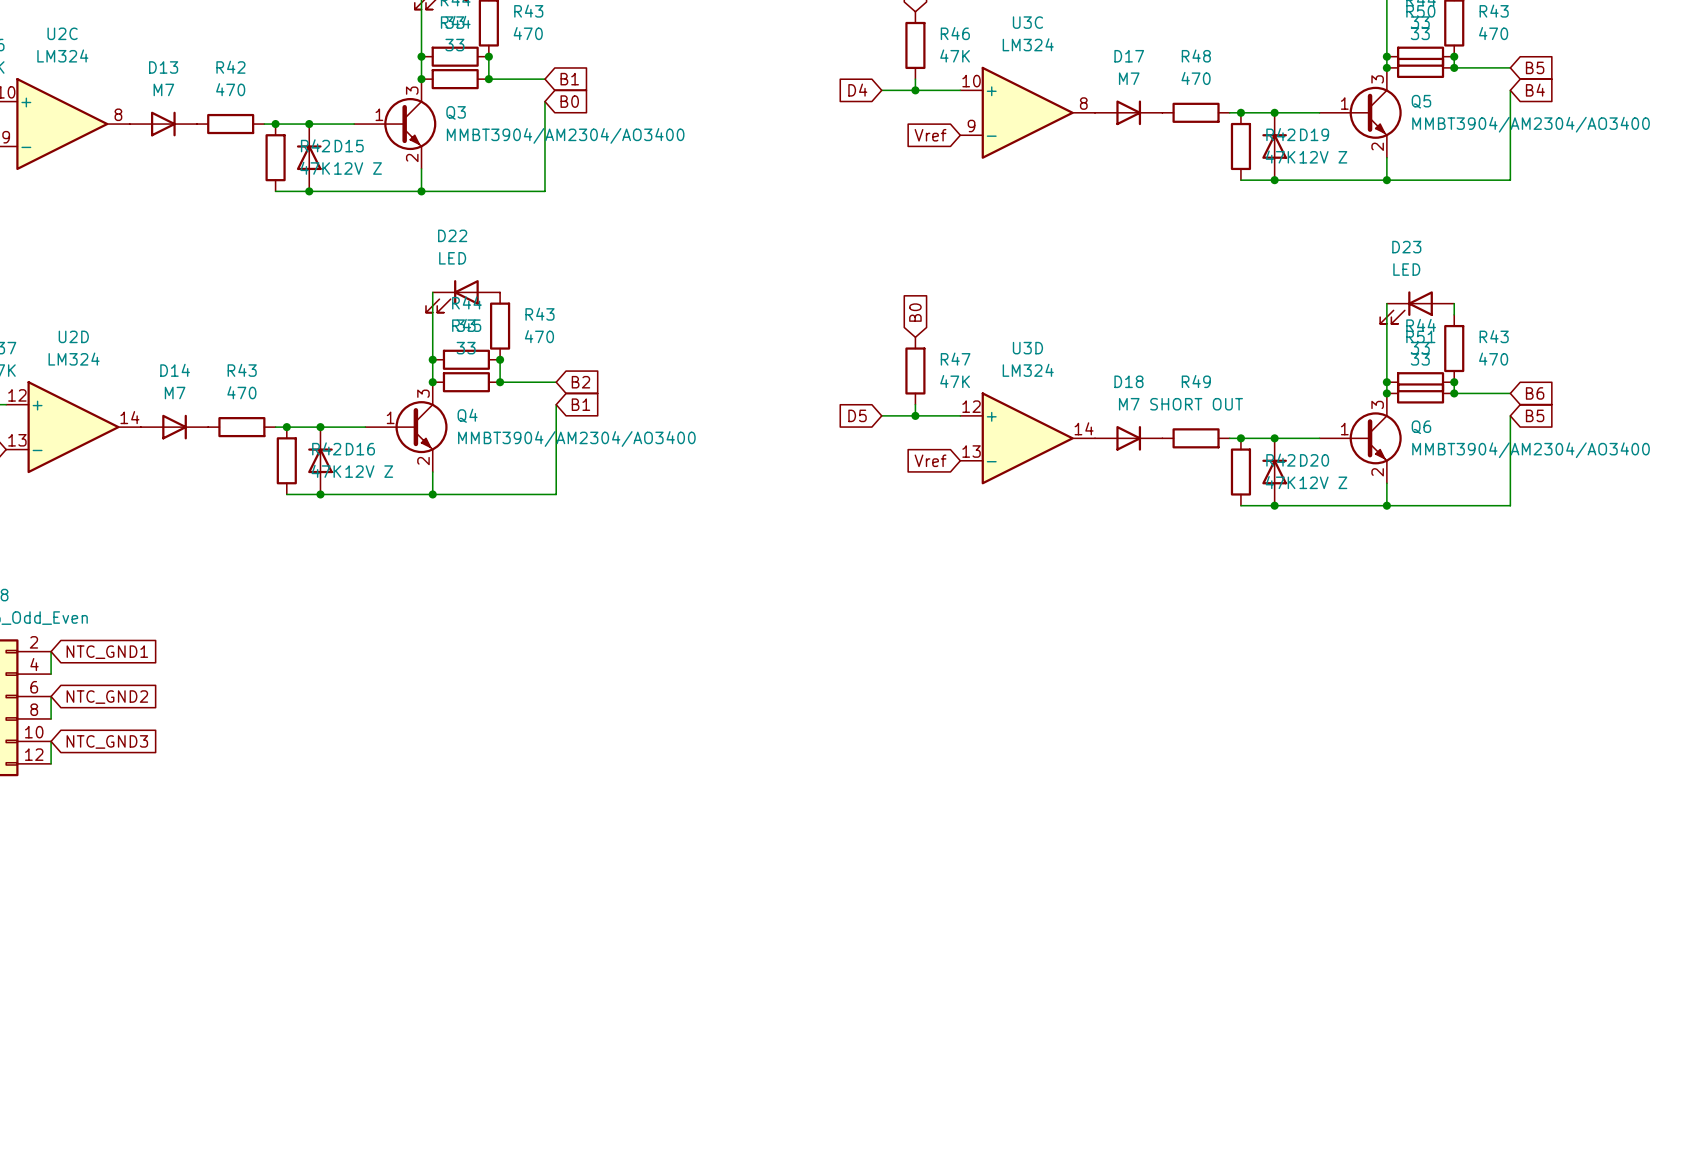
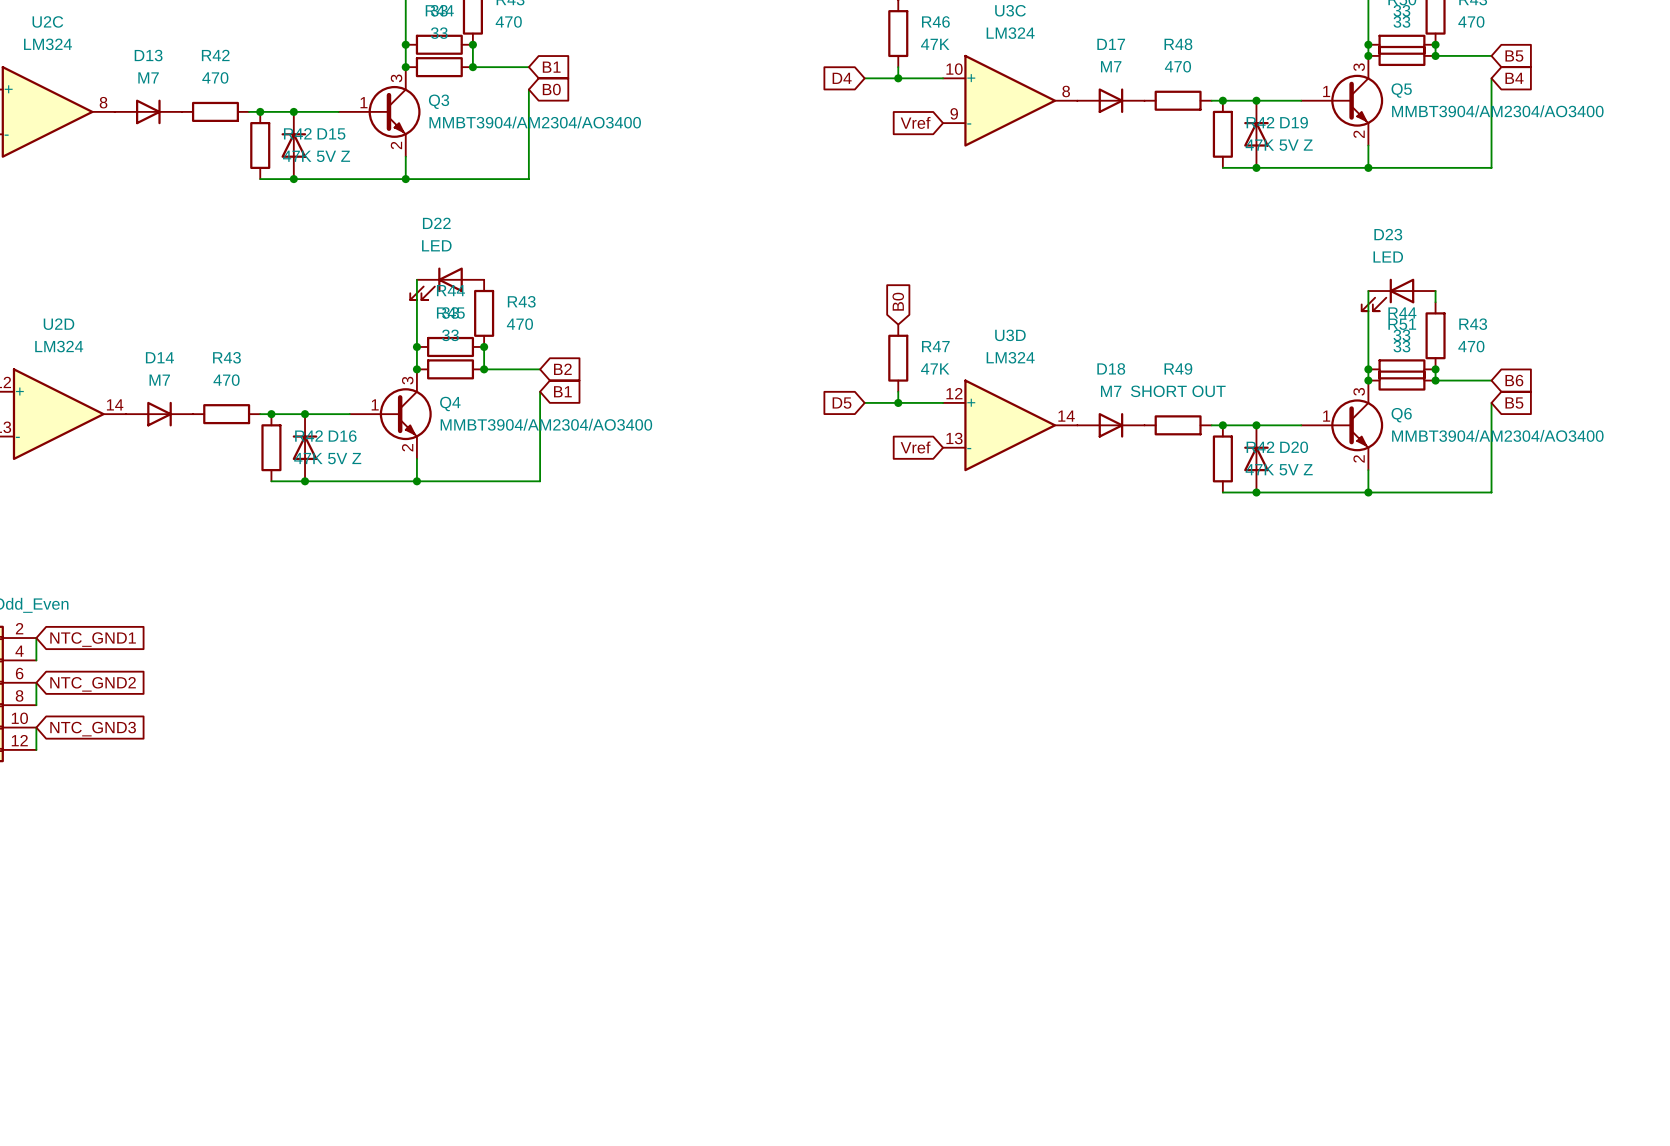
D19 value: 12V Z (1323, 157) -> 5V Z (1296, 145)
D15 value: 12V Z (357, 168) -> 5V Z (333, 156)
D16 value: 12V Z (369, 471) -> 5V Z (344, 458)
D20 value: 12V Z (1323, 482) -> 5V Z (1296, 469)

